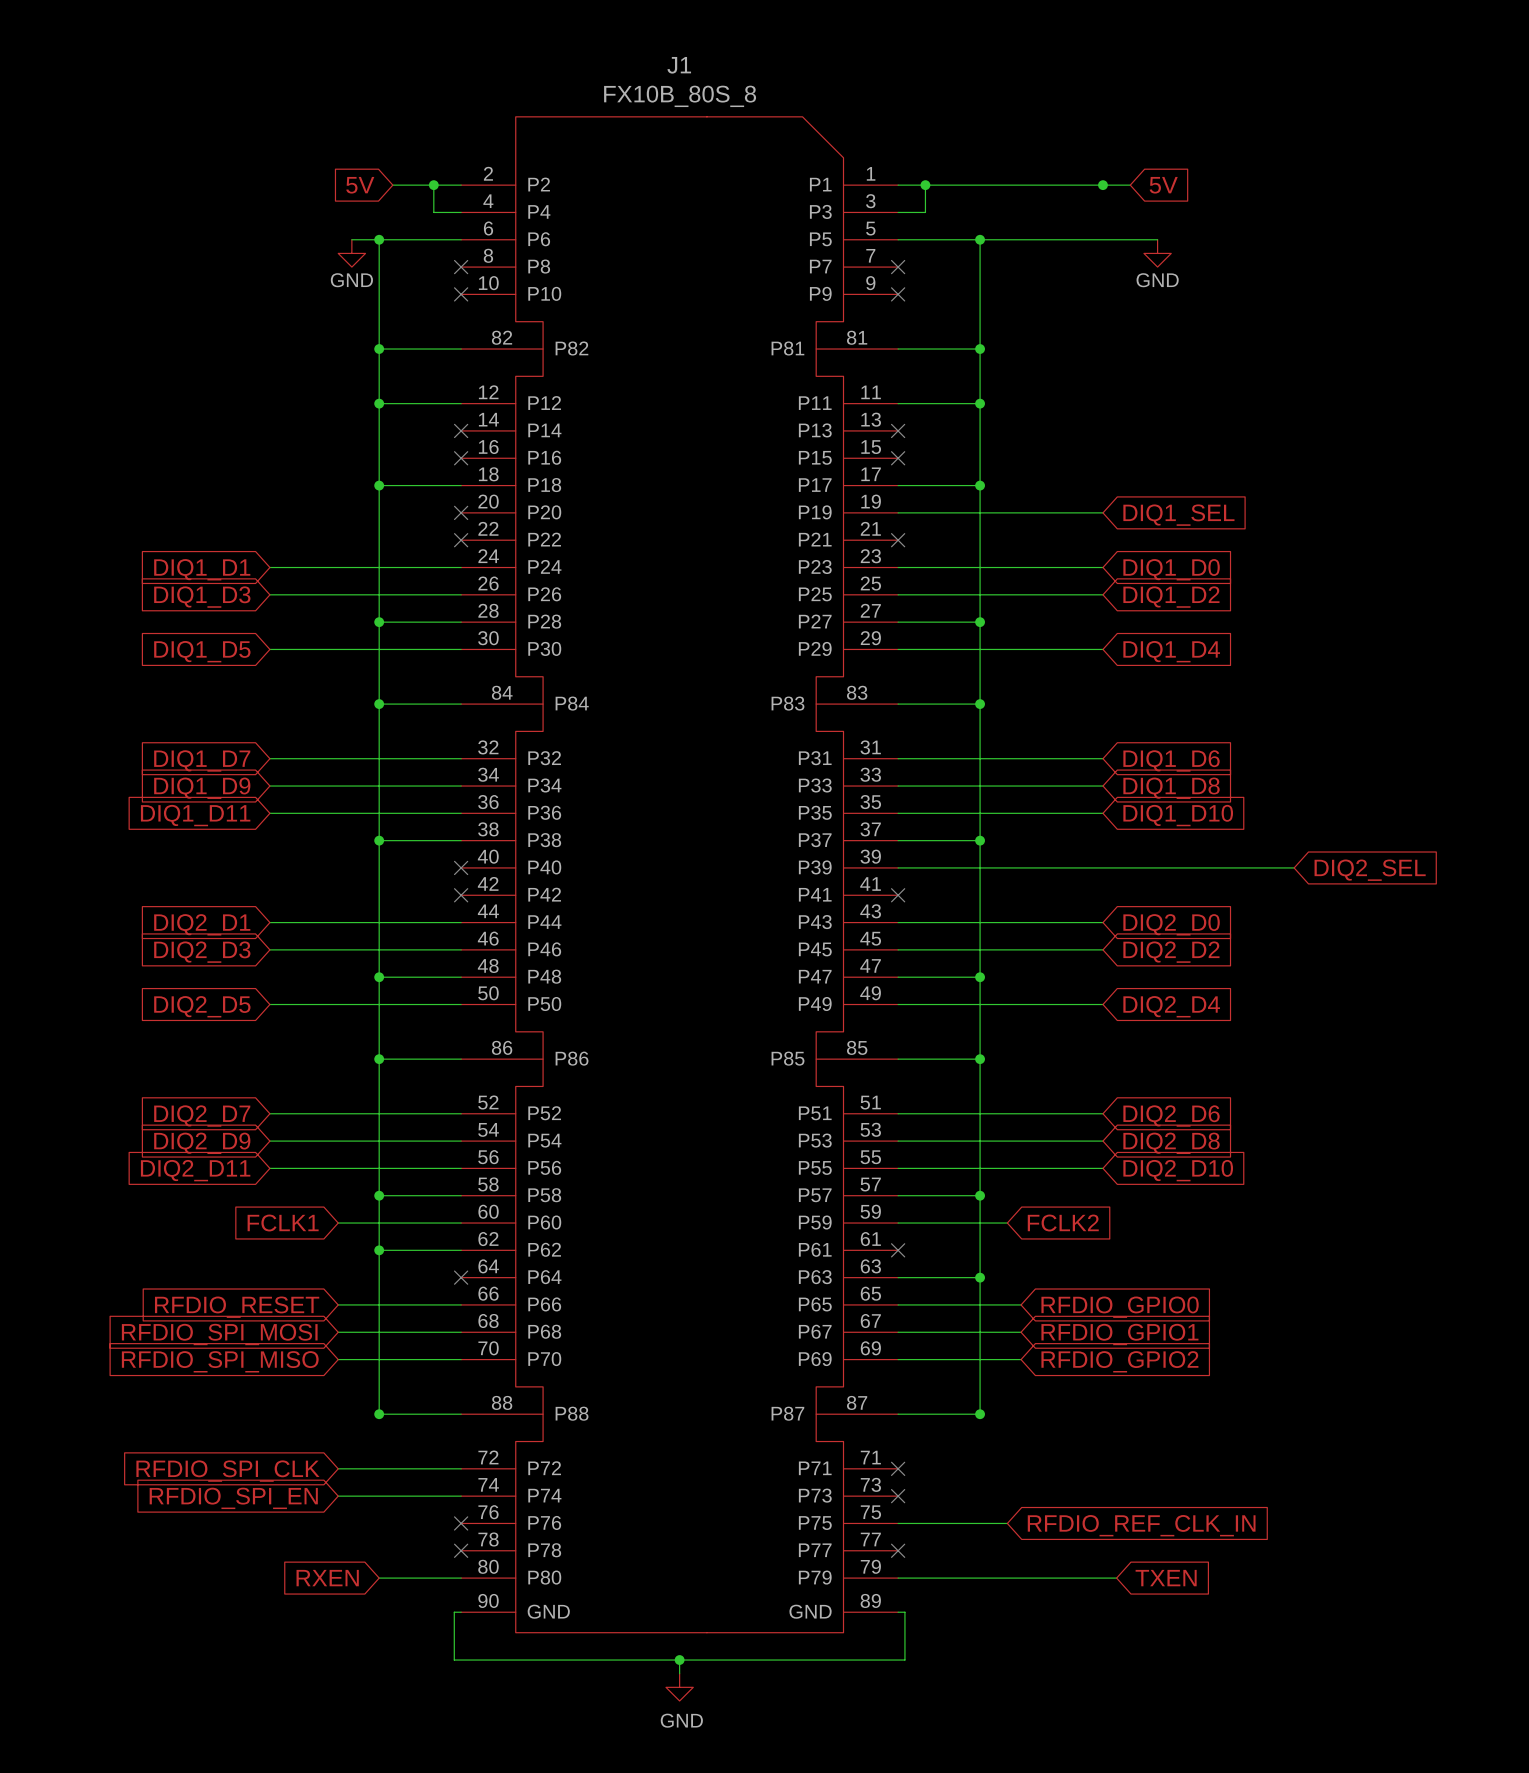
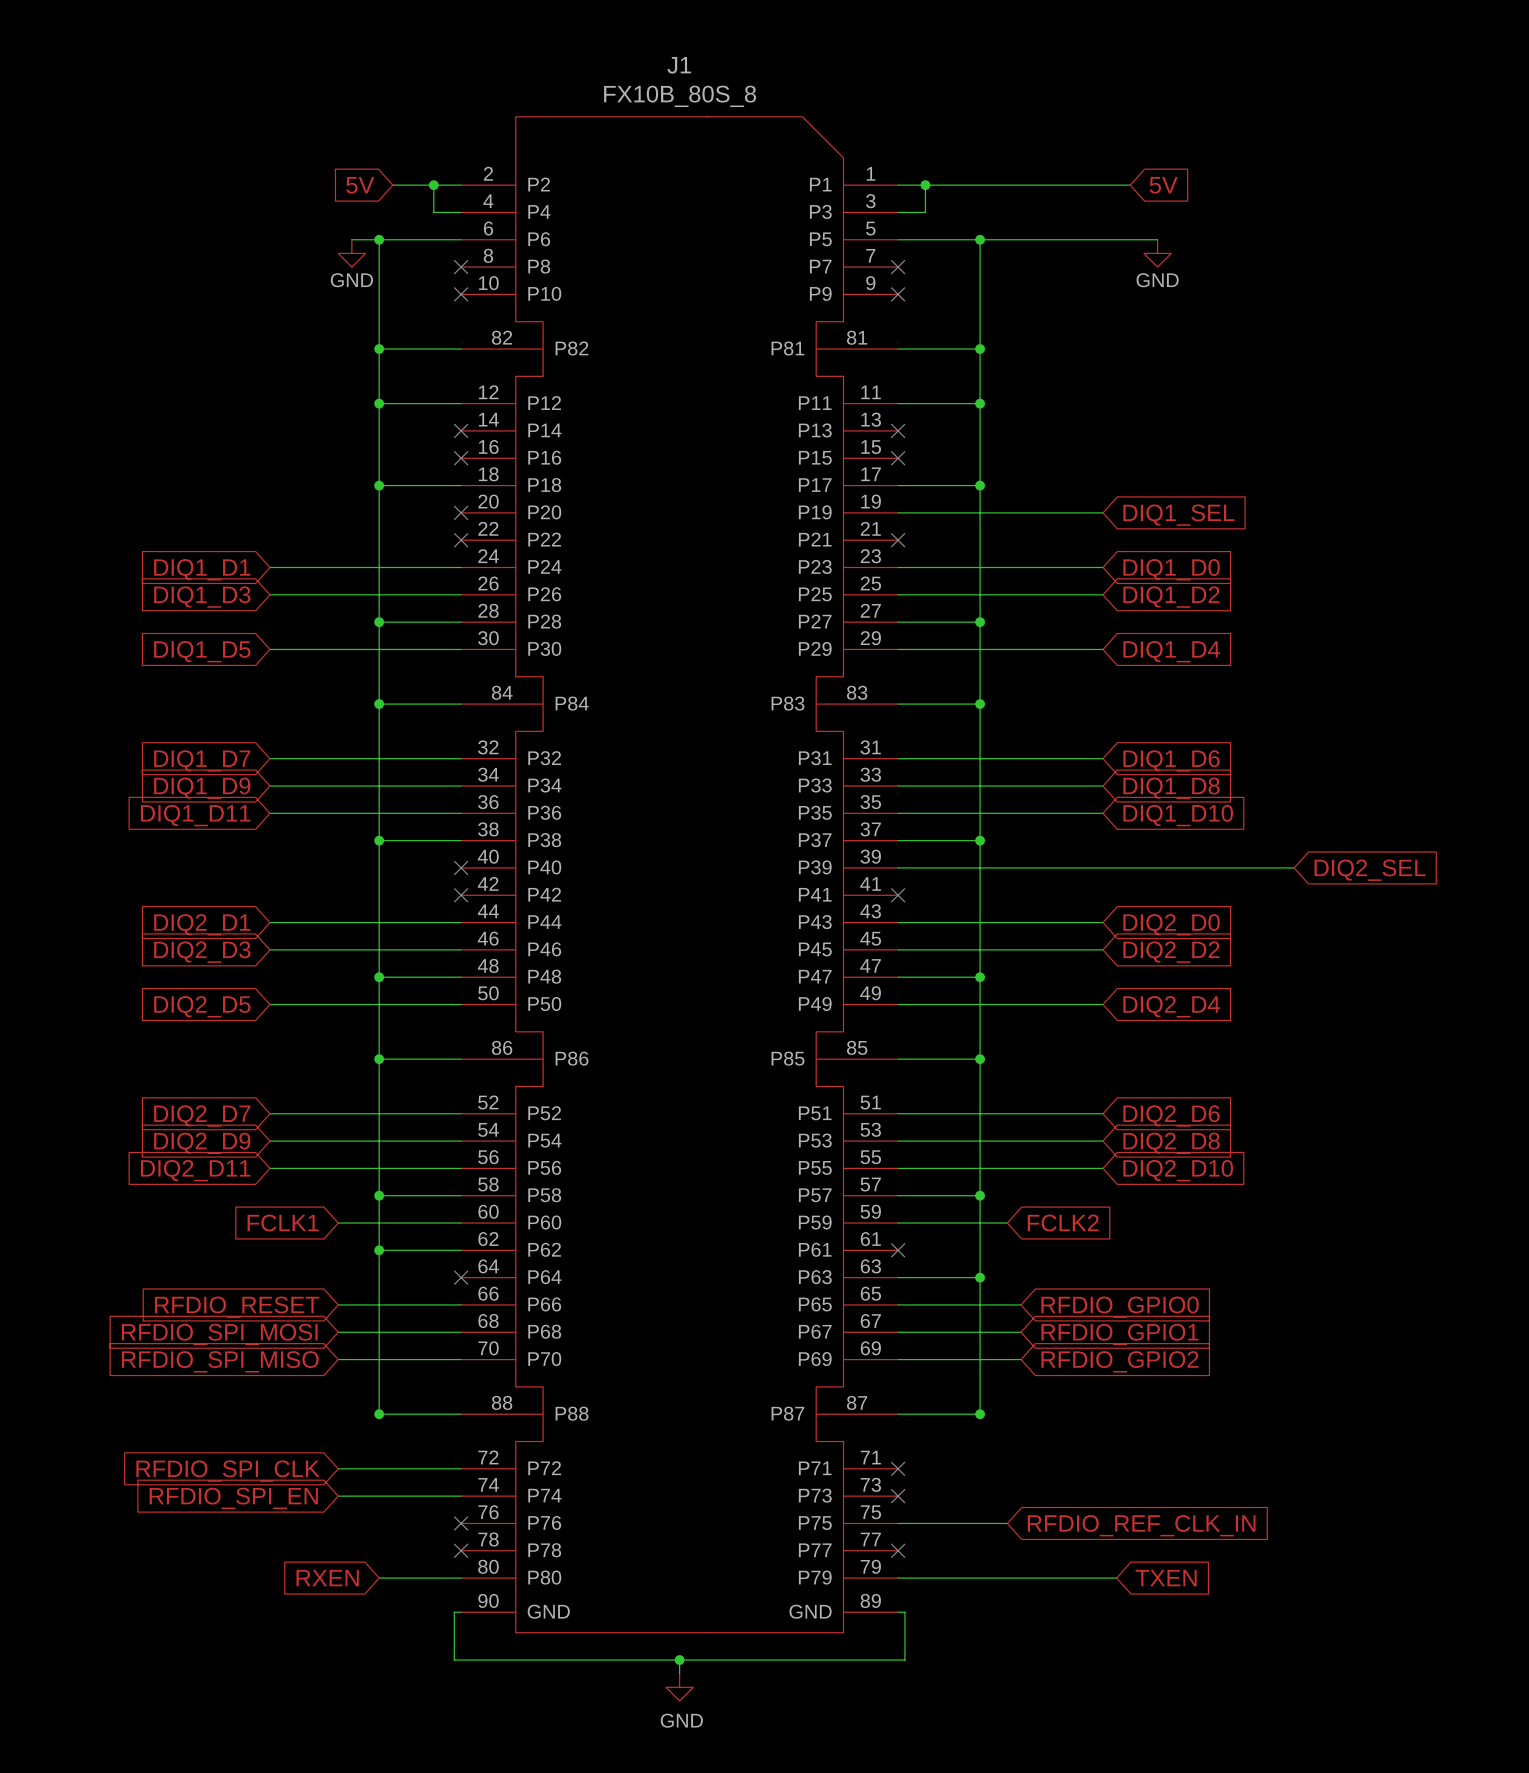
junction: (1102, 185) -> none

